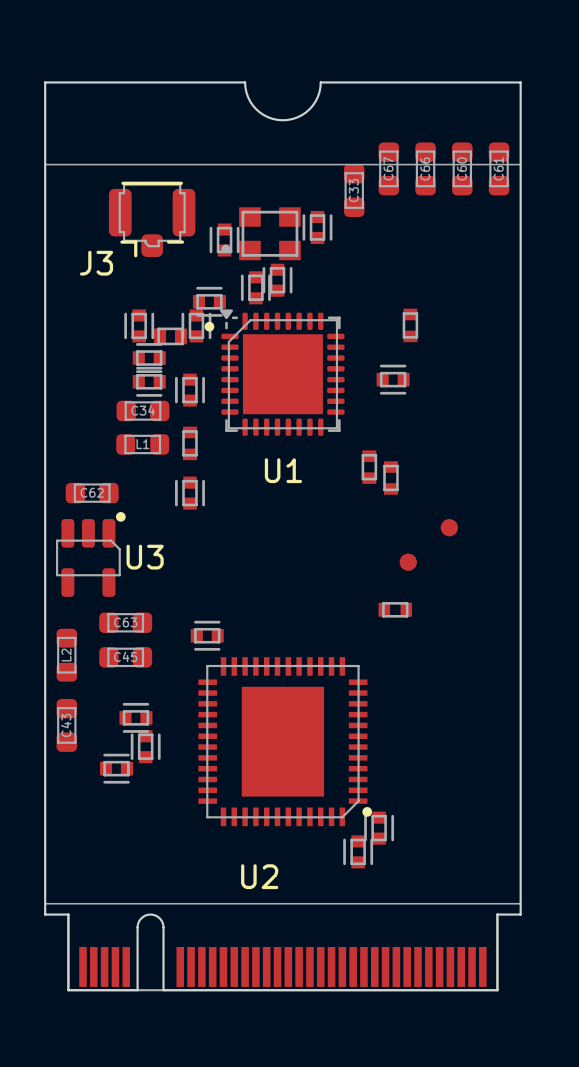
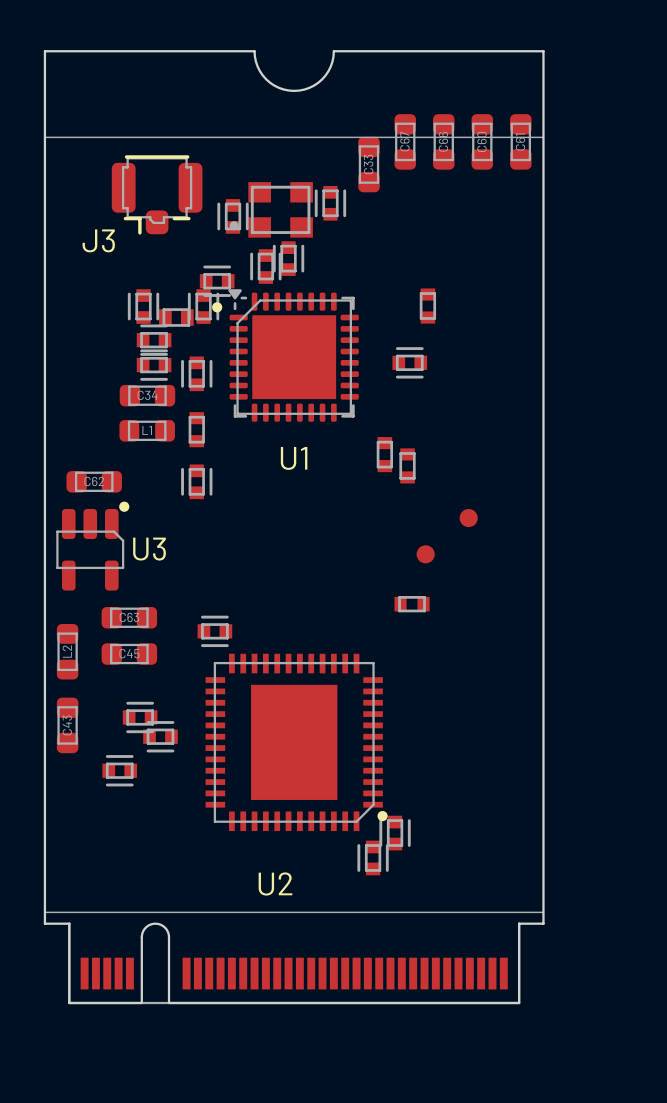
part rotation: 0° (145, 746) -> 90° clockwise (160, 736)
part footprint: [67, 913, 499, 992] -> [68, 922, 521, 1005]

